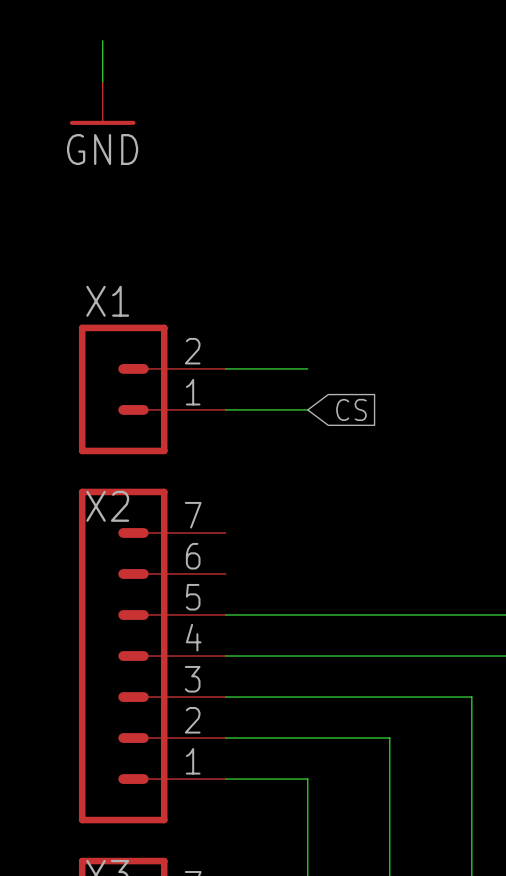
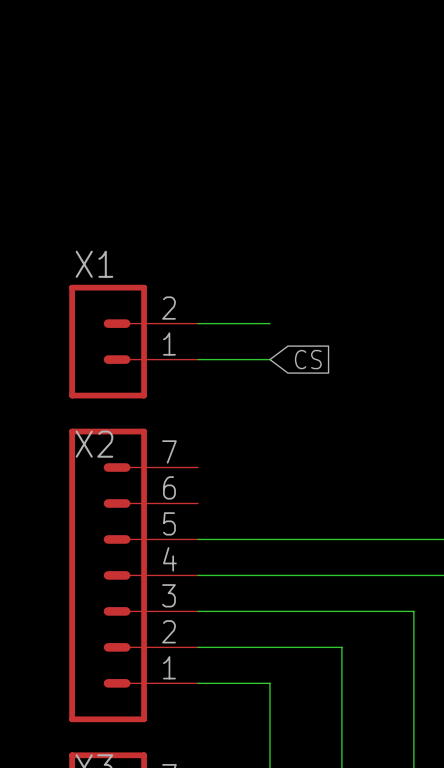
wire: (102, 40) (102, 81) -> none
power symbol: GND (102, 103) -> none

